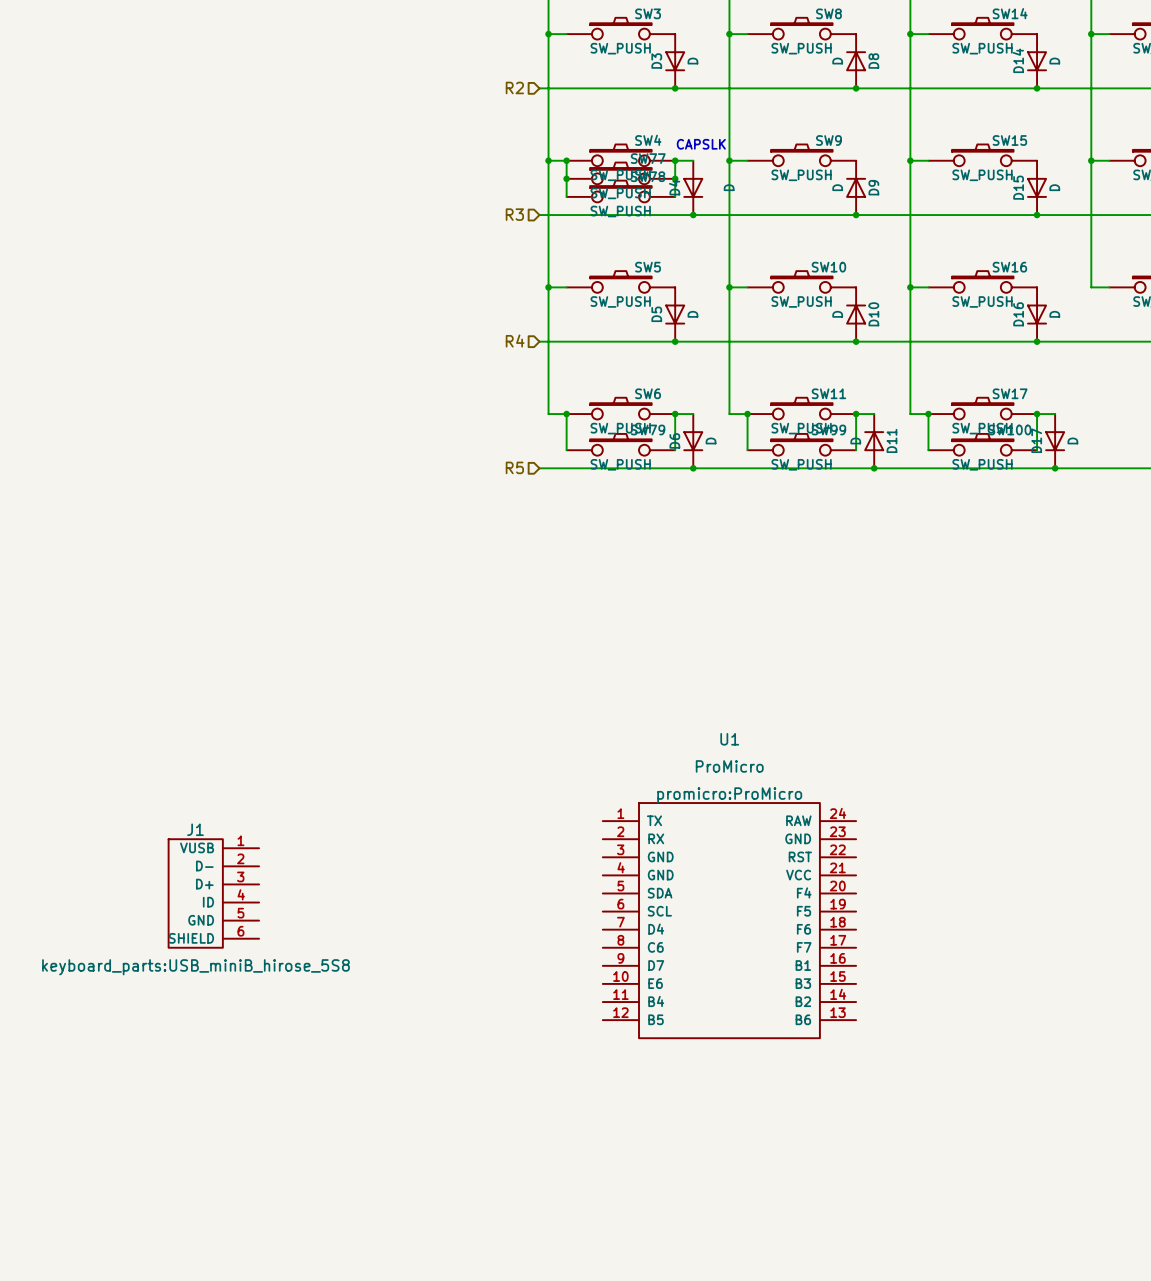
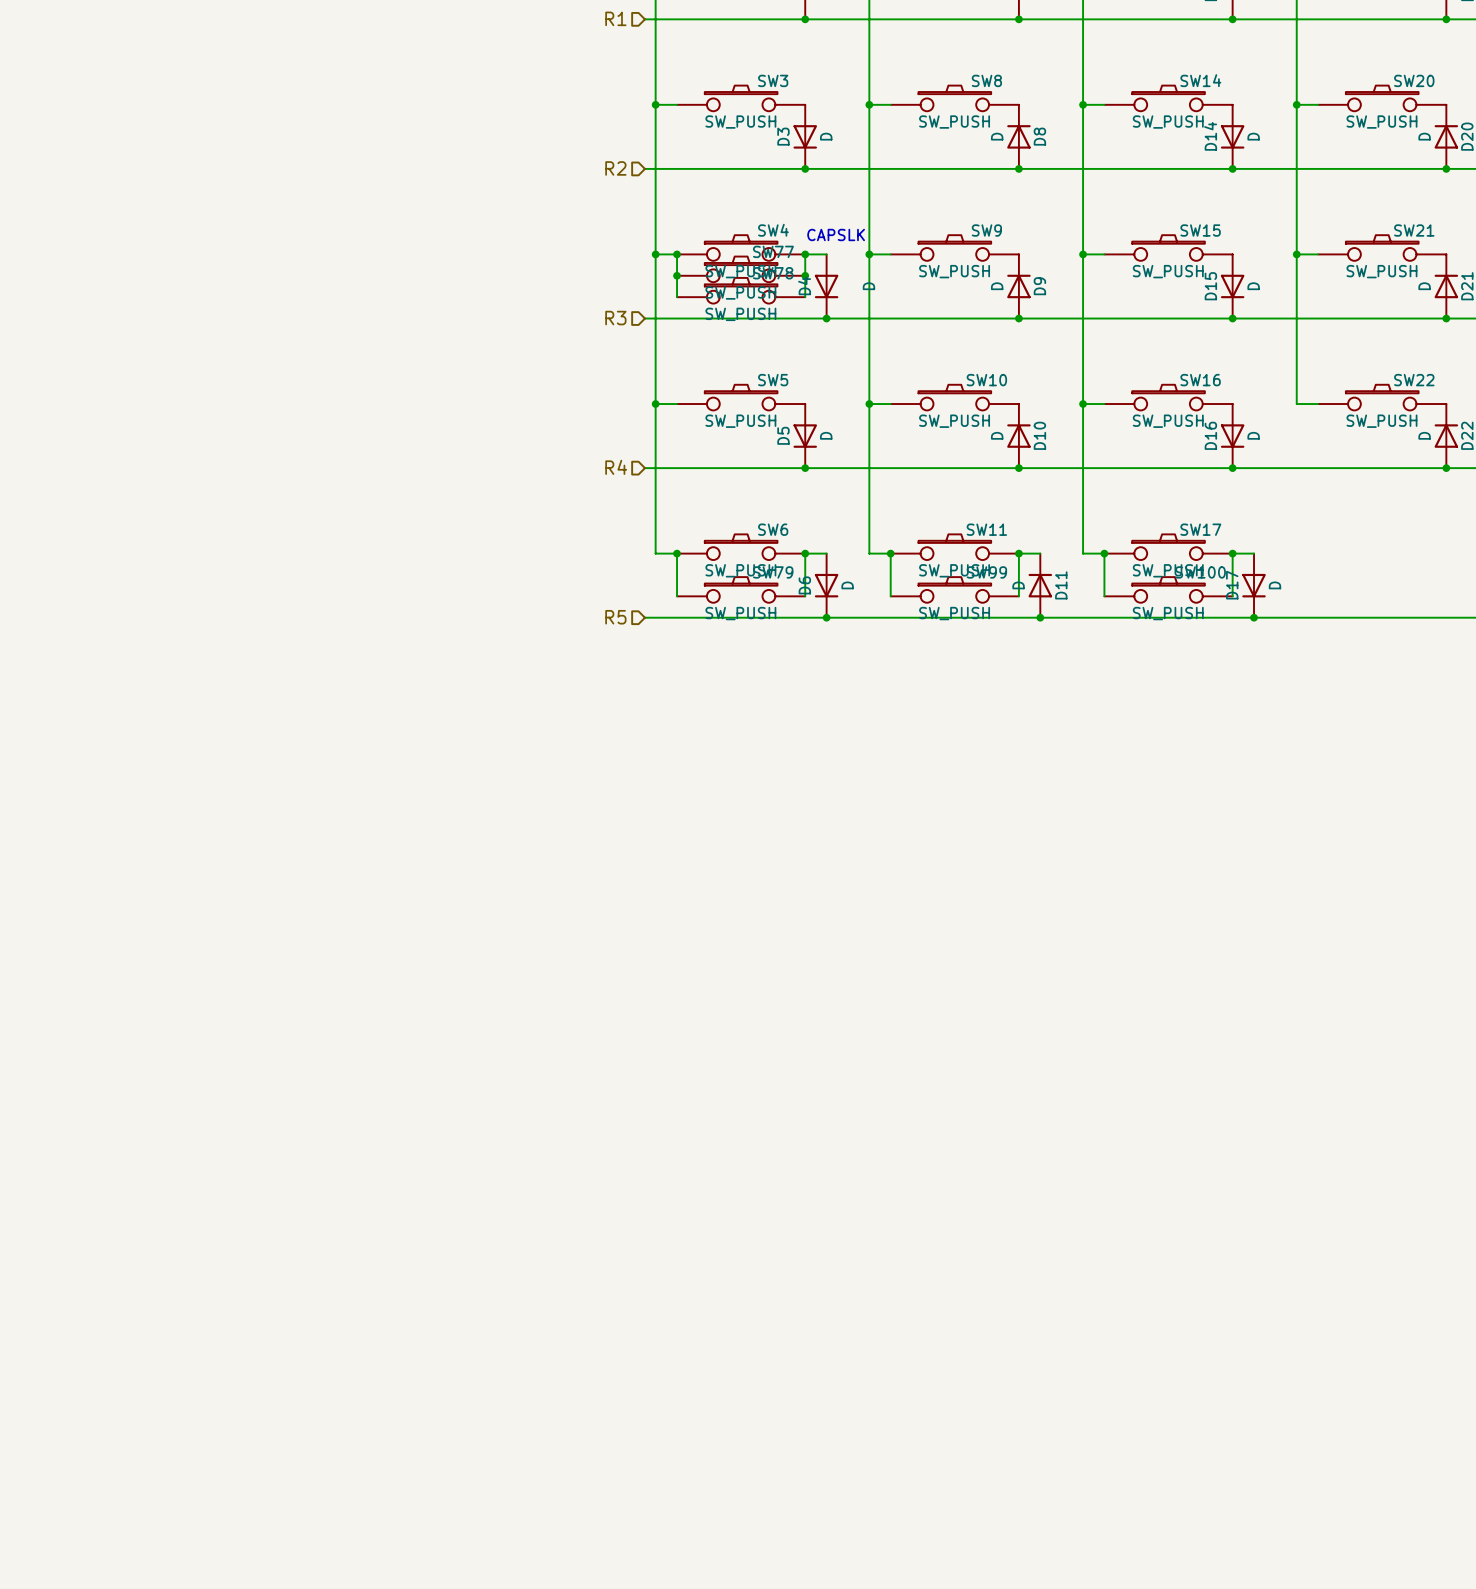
J1: (213, 893) -> none
U1: ProMicro (729, 920) -> none

